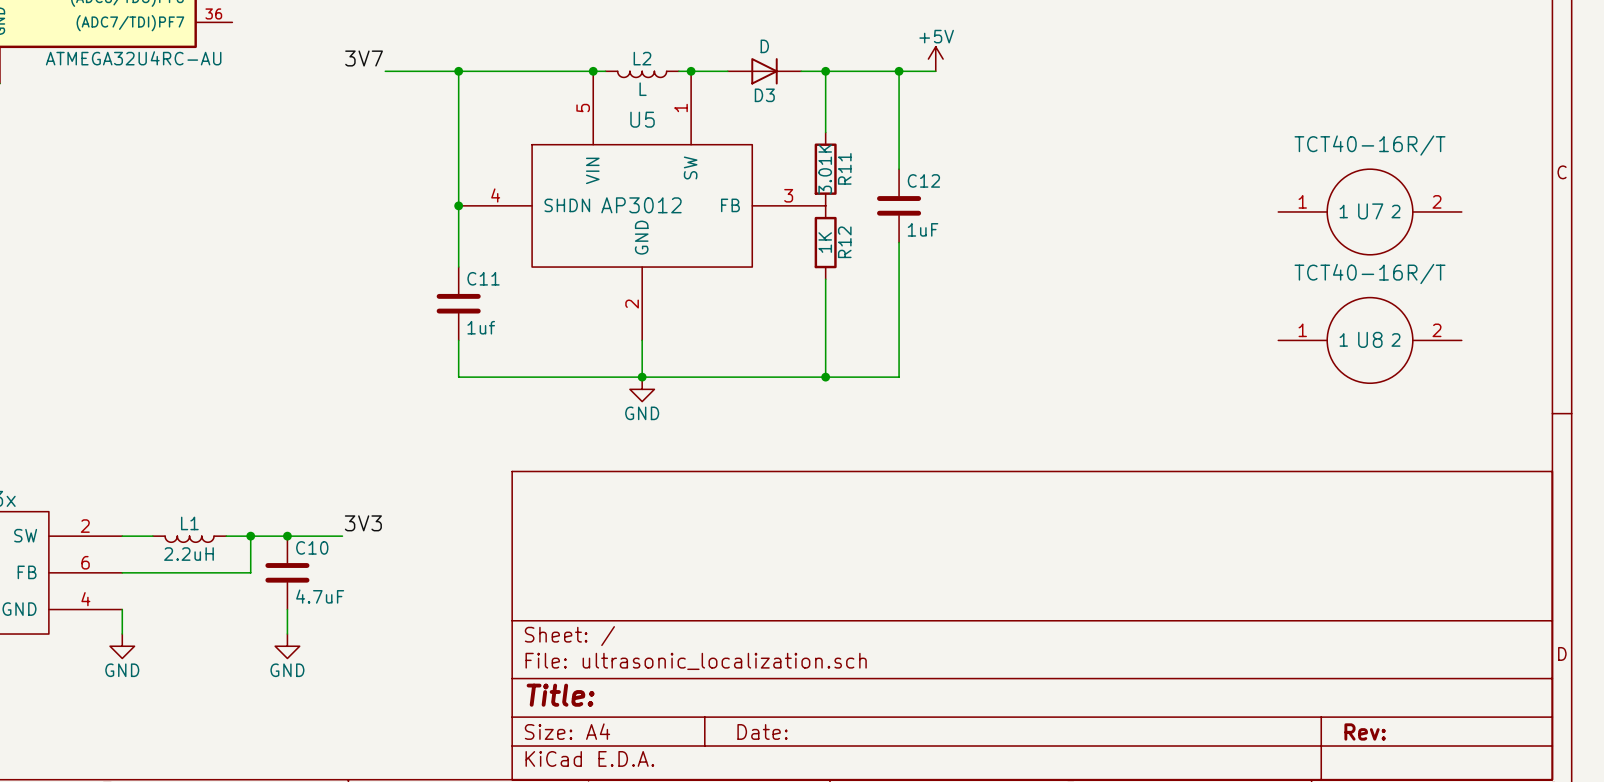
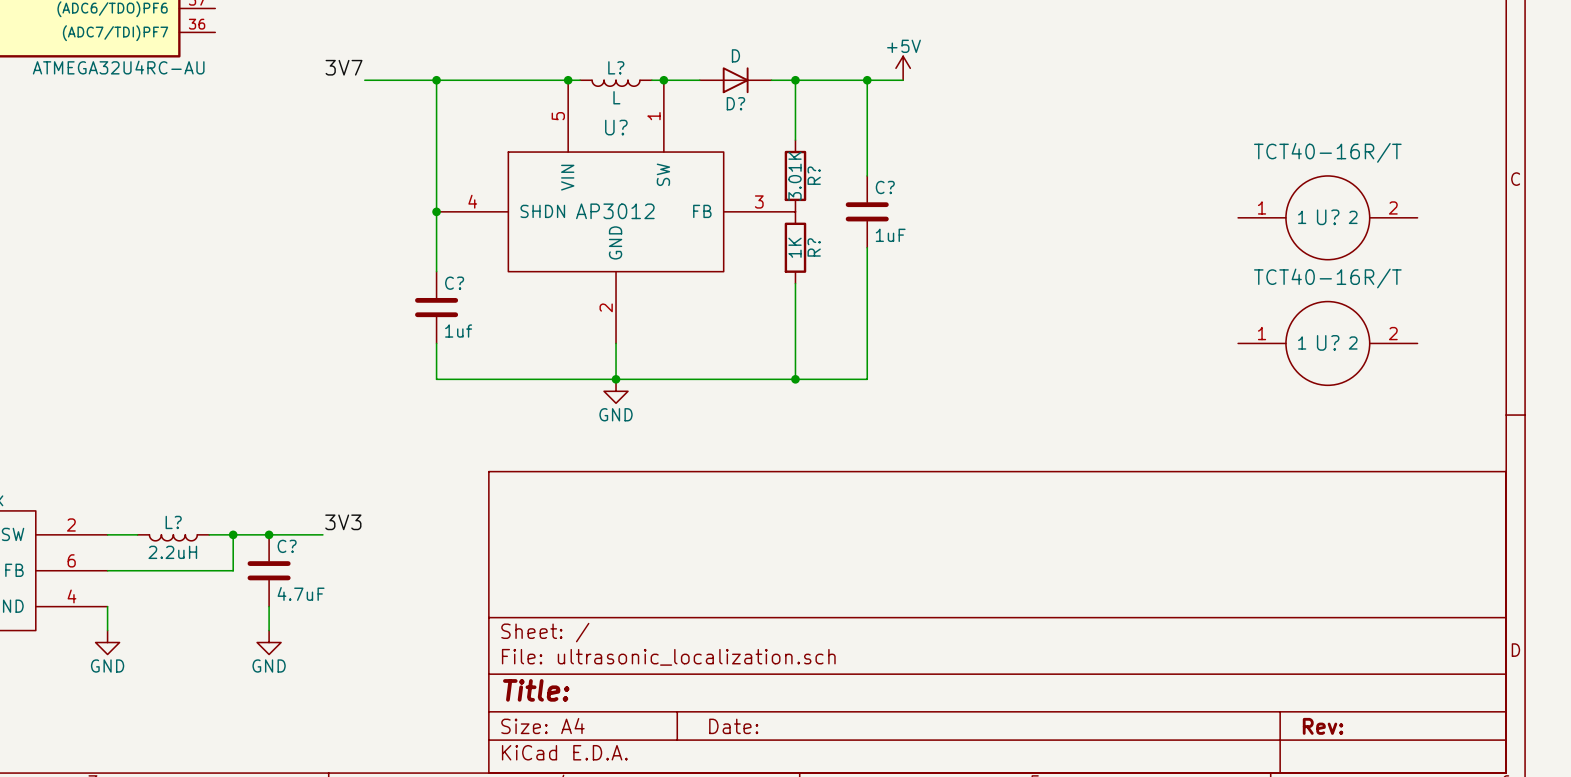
L2 name: L2 (642, 58) -> L? (616, 67)
D3 name: D3 (764, 95) -> D? (735, 103)
U5 name: U5 (642, 119) -> U? (616, 127)
R11 name: R11 (844, 168) -> R? (814, 175)
C12 name: C12 (923, 180) -> C? (885, 187)
U7 name: U7 (1370, 211) -> U? (1328, 217)
R12 name: R12 (844, 242) -> R? (814, 247)
C11 name: C11 (483, 278) -> C? (454, 283)
U8 name: U8 (1370, 339) -> U? (1328, 342)
L1 name: L1 (189, 523) -> L? (173, 522)
C10 name: C10 (312, 547) -> C? (287, 546)

